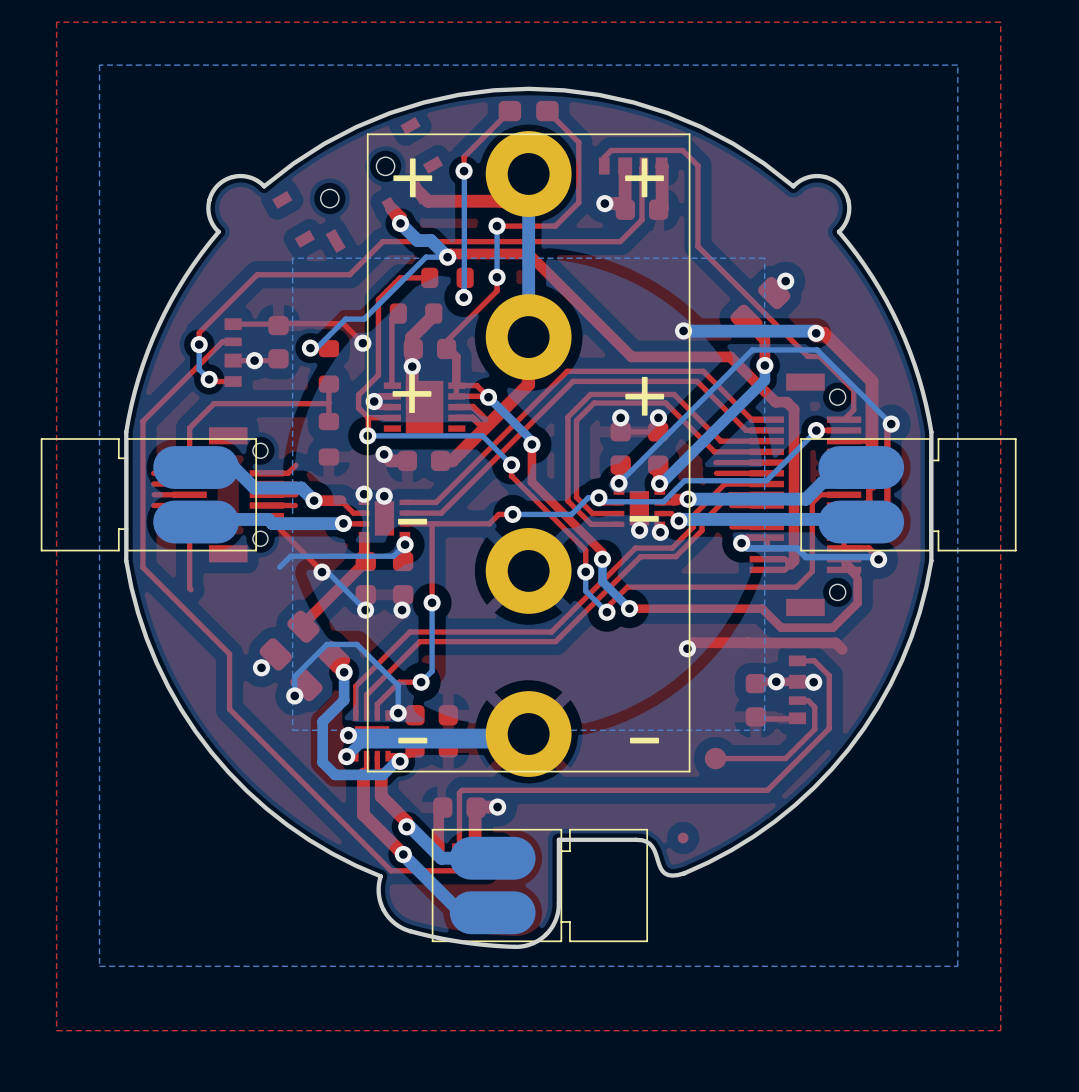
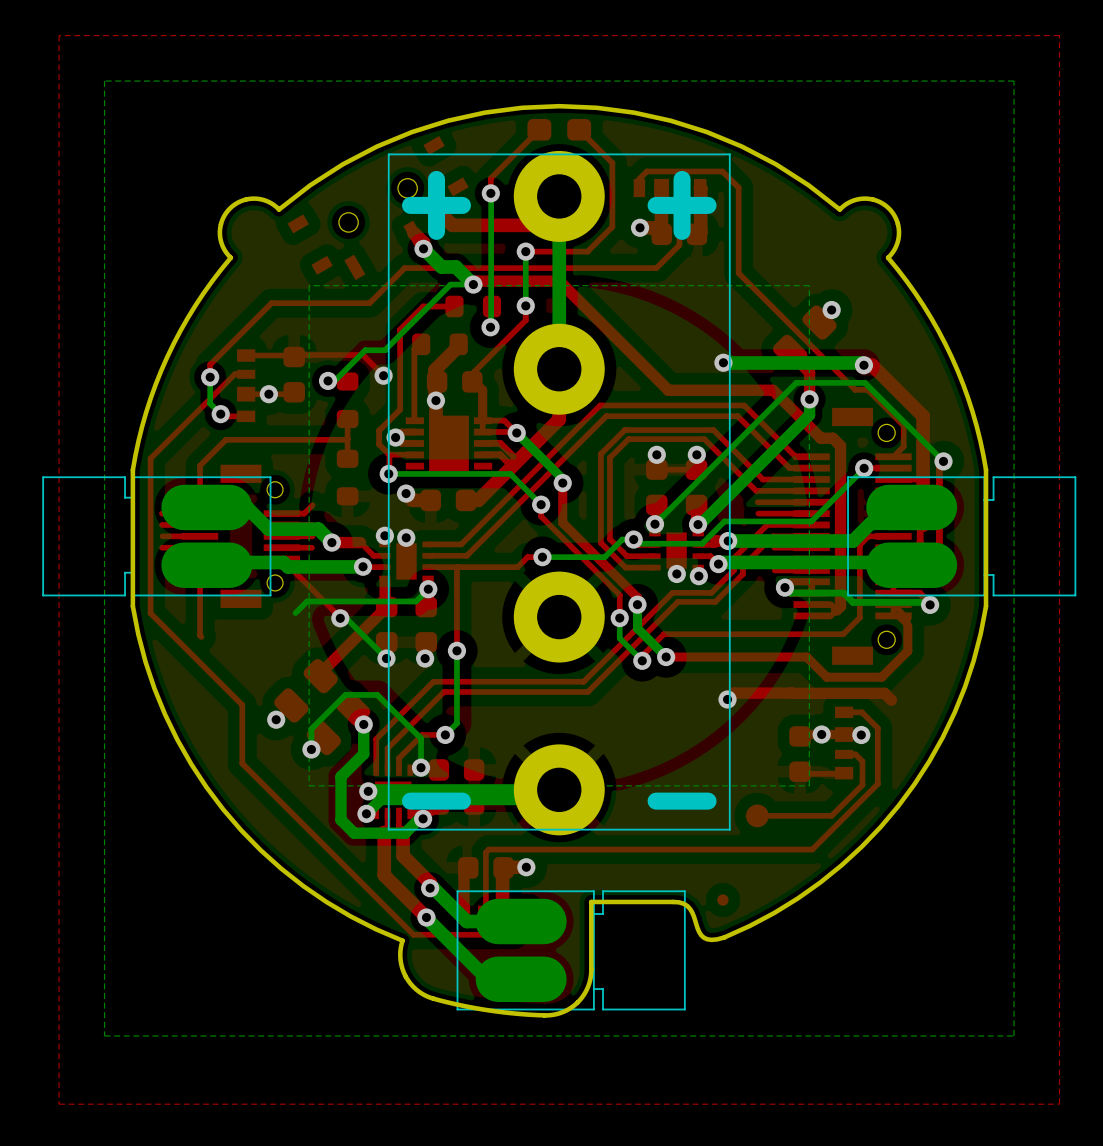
text: + (412, 393) -> none
text: + (644, 396) -> none
text: - (644, 518) -> none
text: - (412, 521) -> none

